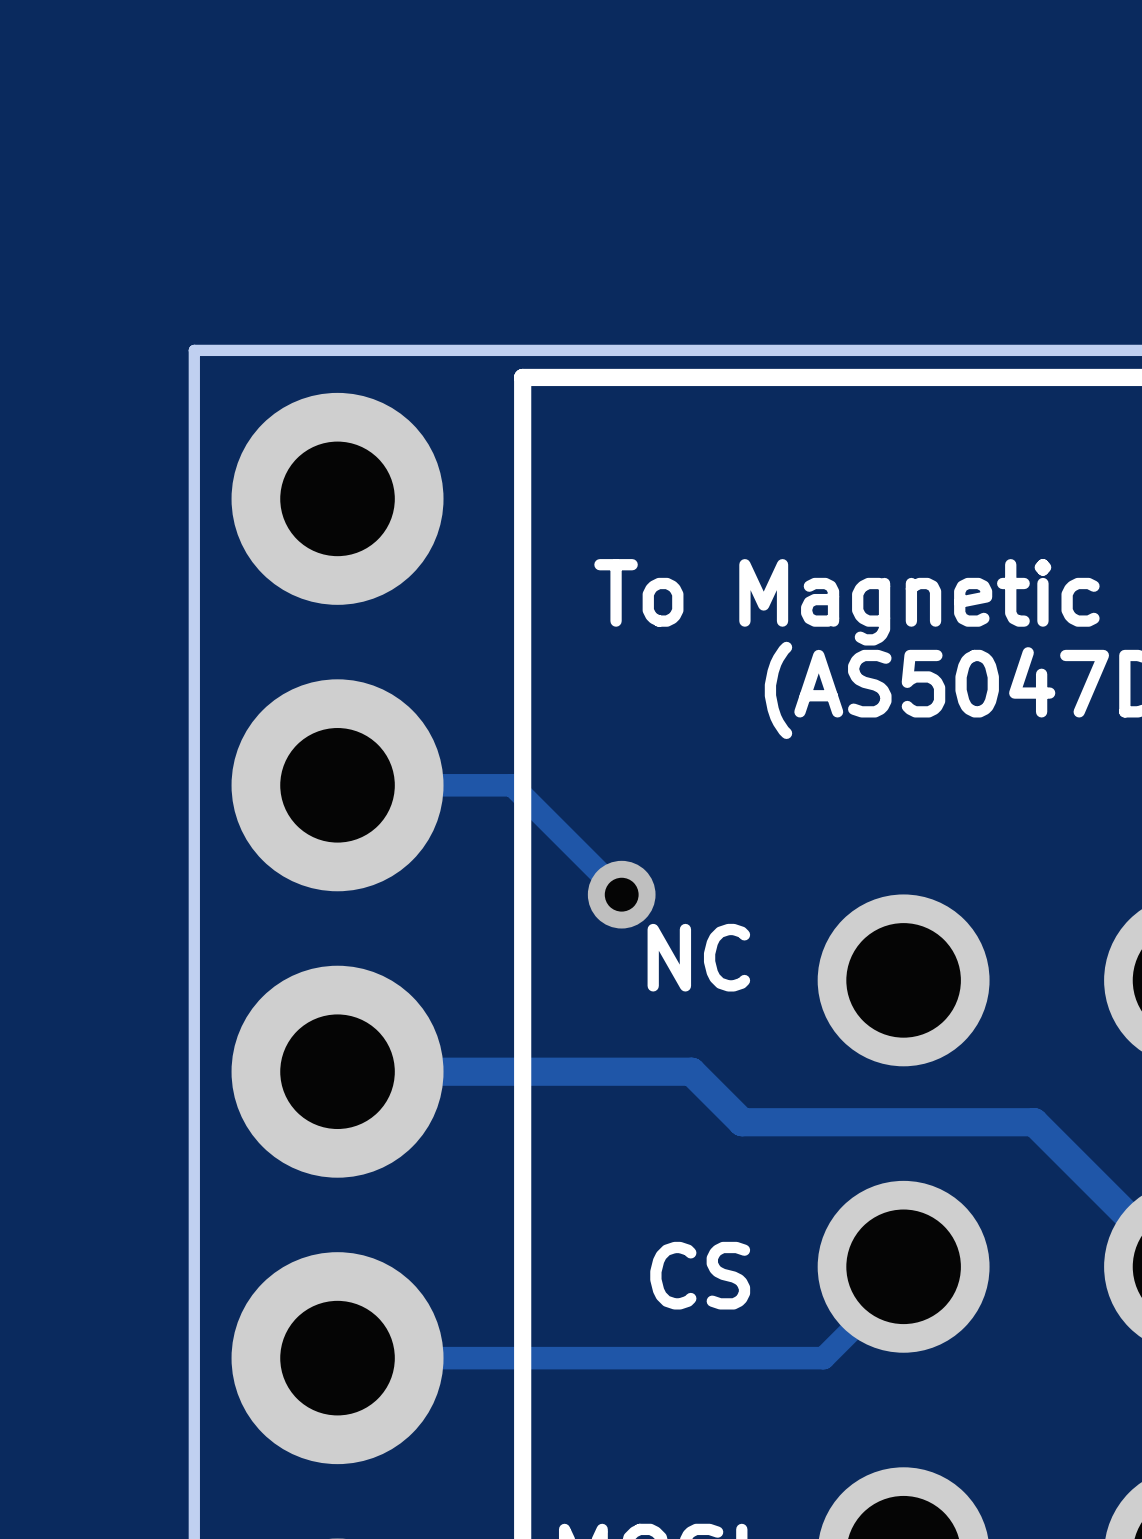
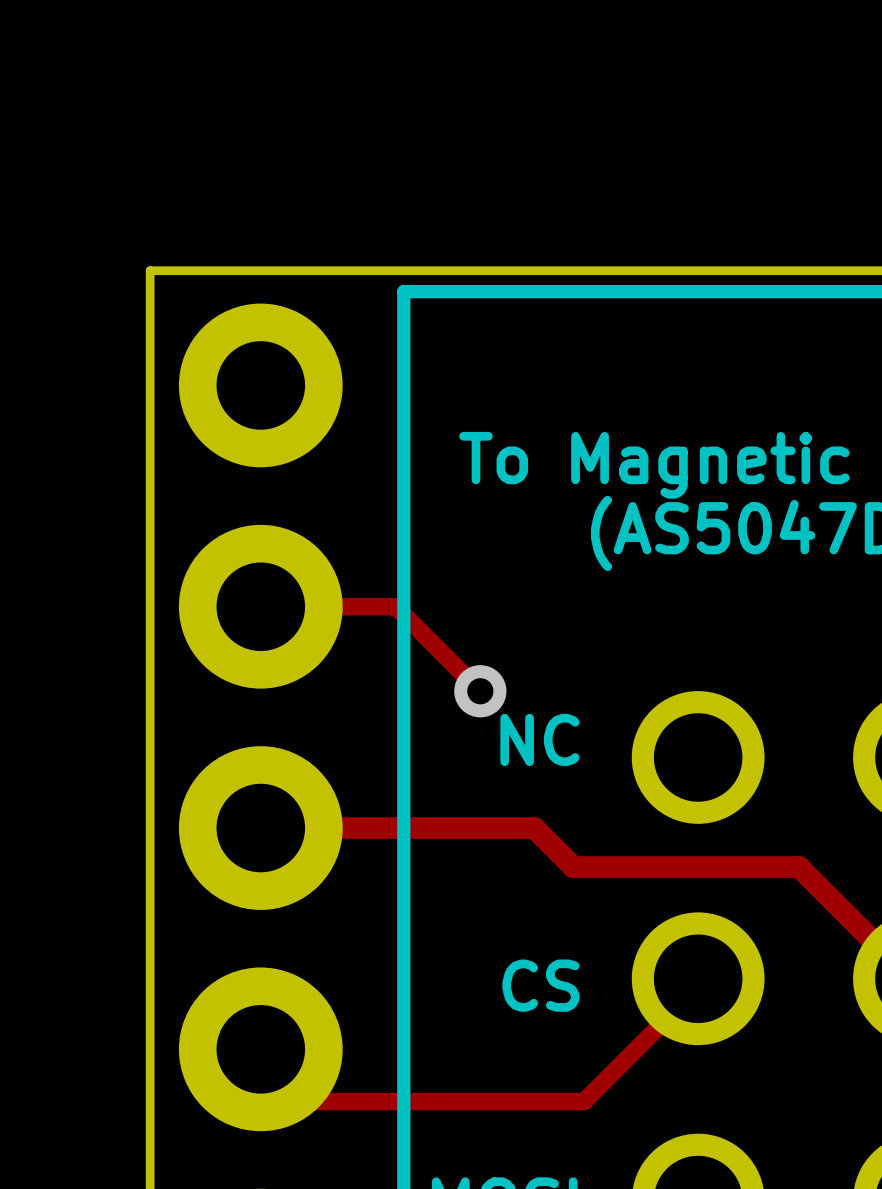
track: (338, 1358) (823, 1358) -> (261, 1049) (313, 1101) (584, 1101) (636, 1049)

